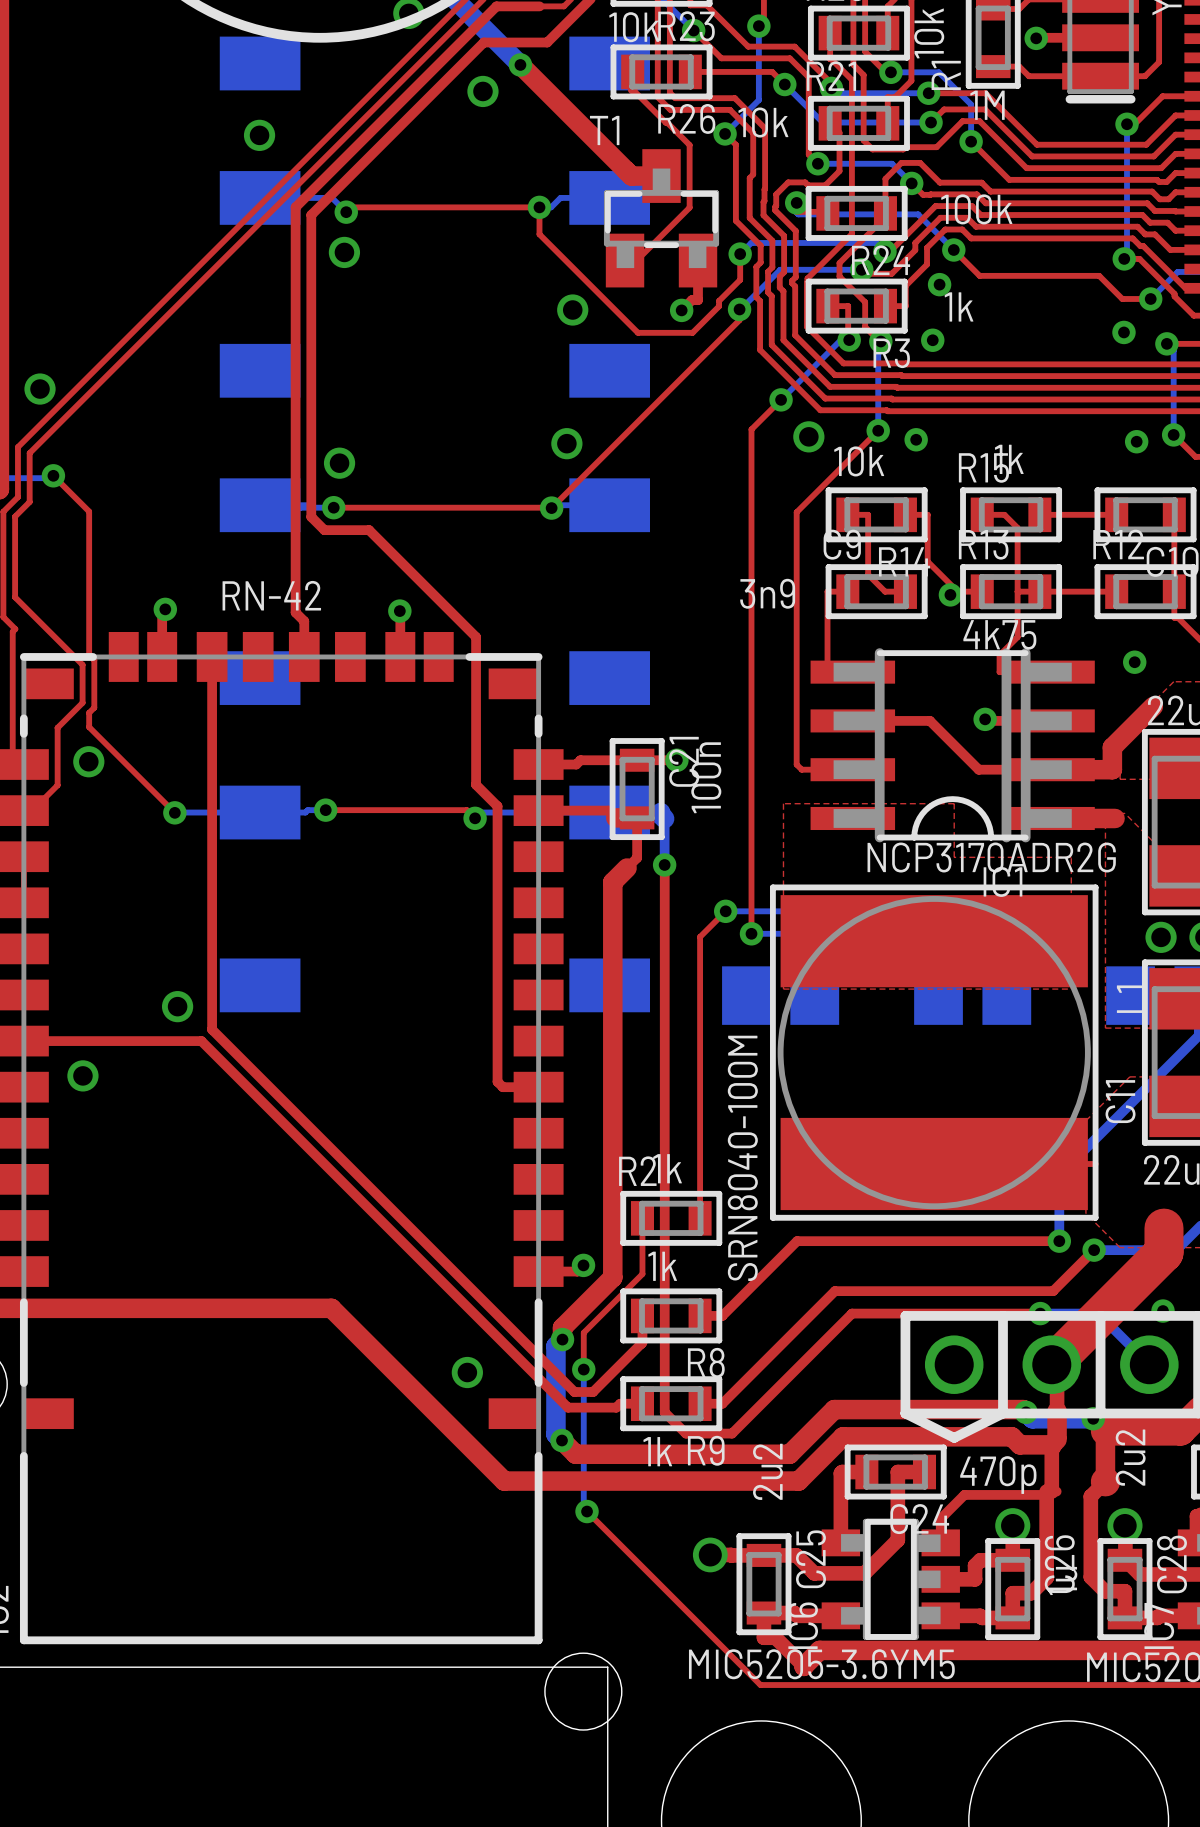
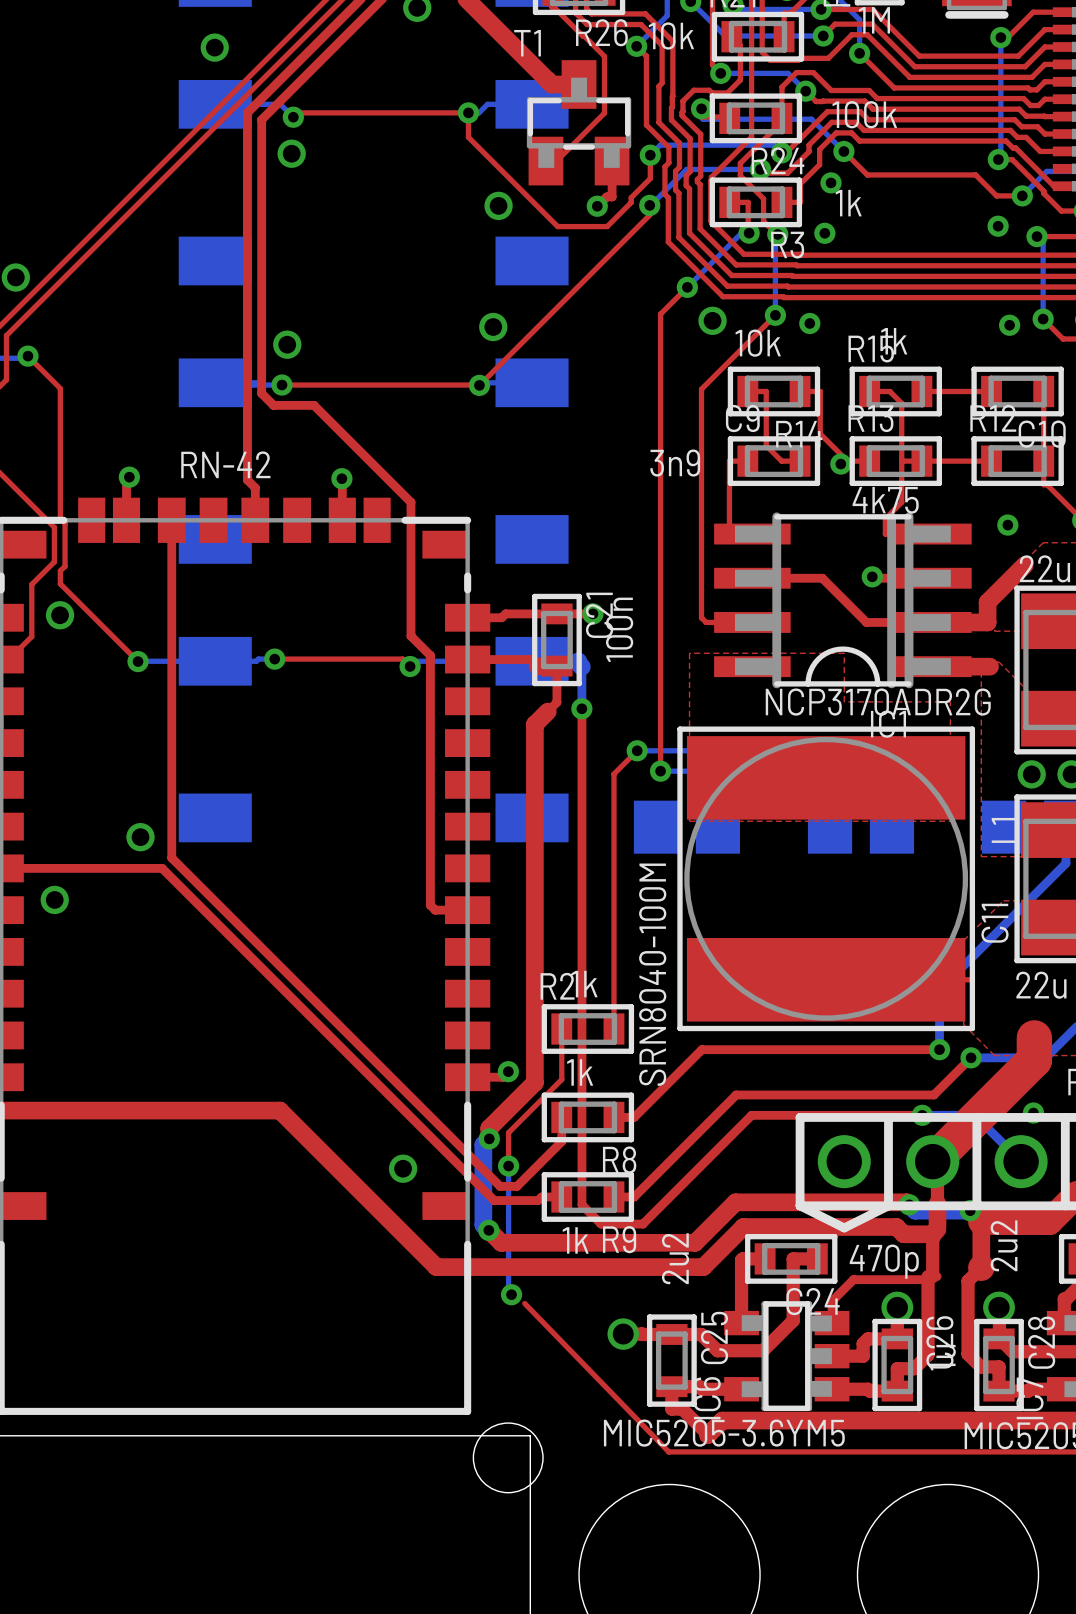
top track: (587, 1511) (760, 1685) -> (524, 1303) (668, 1451)

